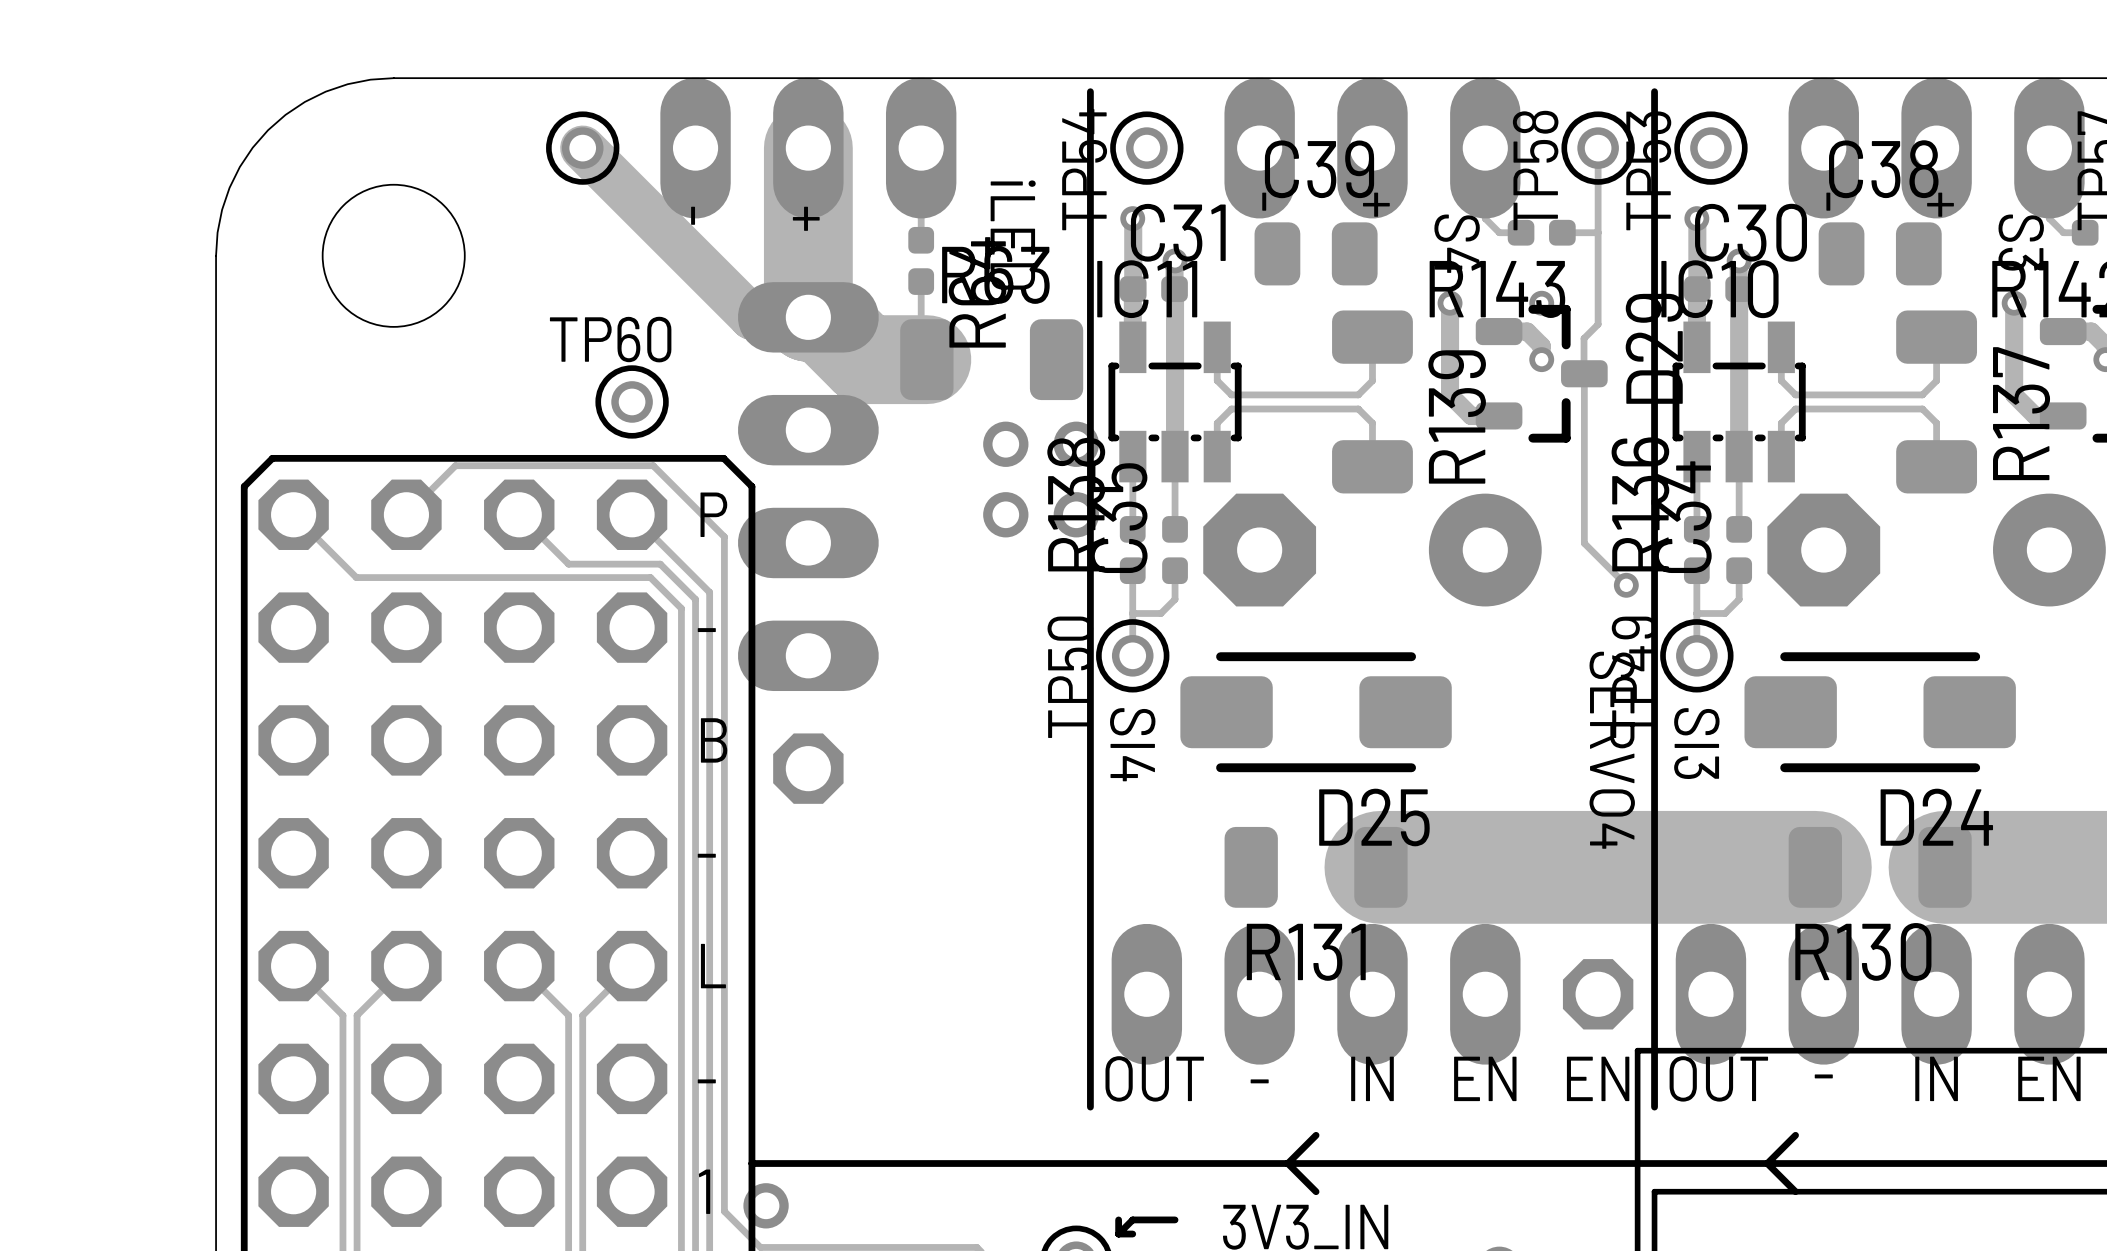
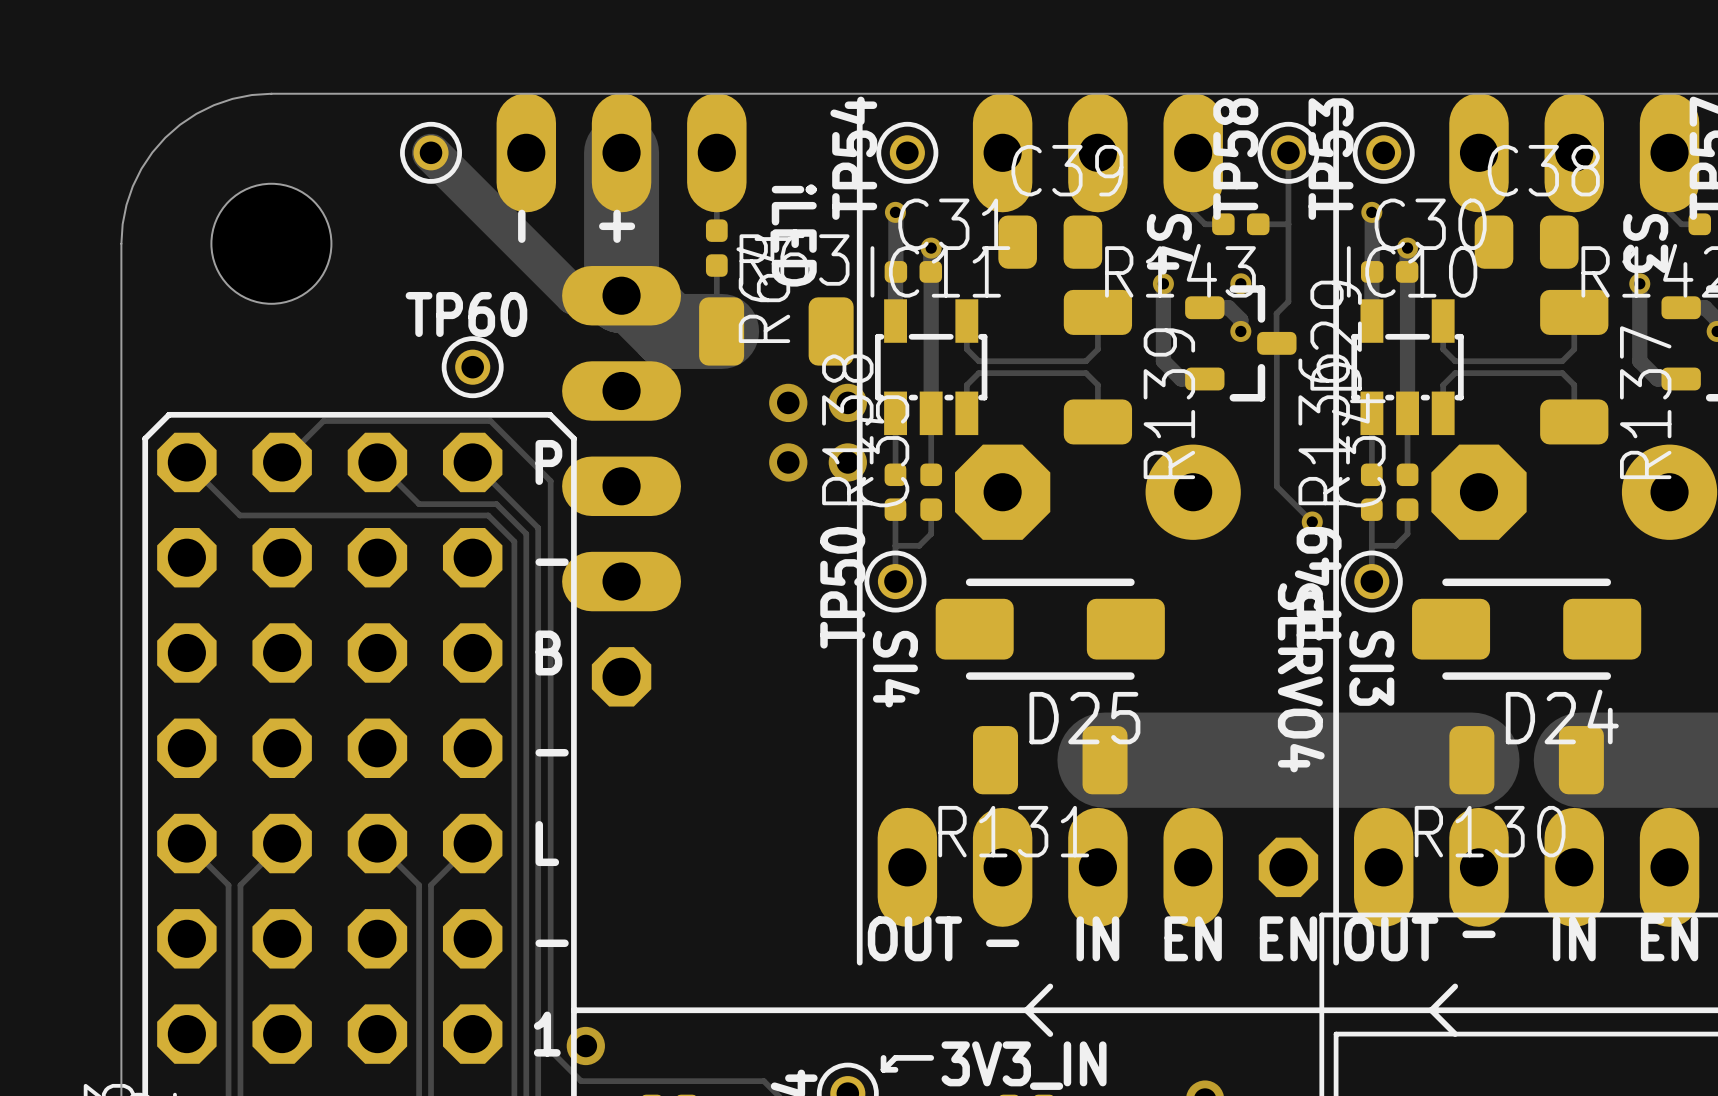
text: - (1264, 201) -> none
text: - (1828, 201) -> none
text: + (1376, 204) -> none
text: + (1940, 204) -> none

